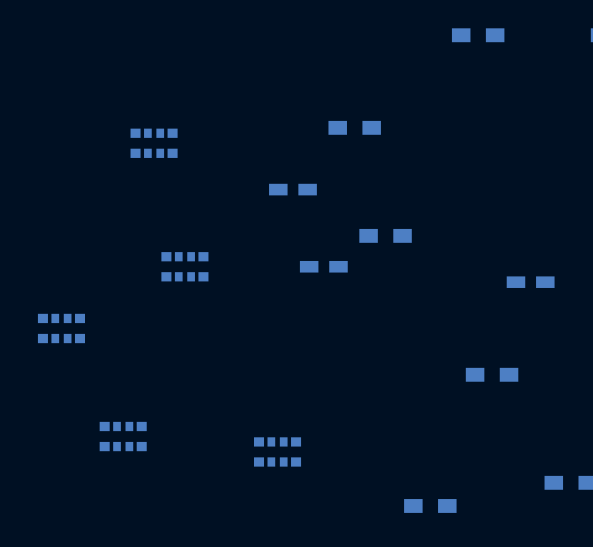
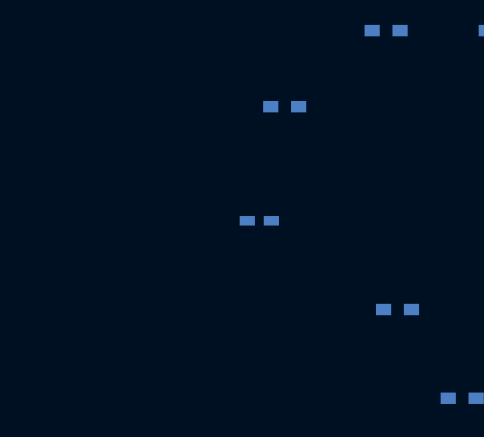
part: (154, 143) -> none
part: (292, 189) -> none
part: (385, 235) -> none
part: (184, 266) -> none
part: (530, 282) -> none
part: (61, 328) -> none
part: (123, 436) -> none
part: (277, 451) -> none
part: (430, 505) -> none

